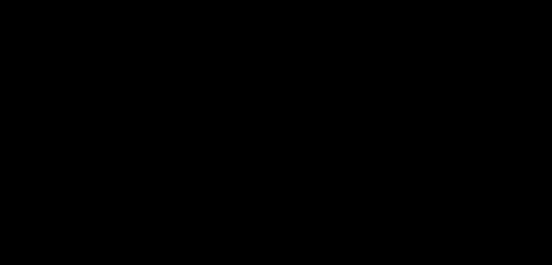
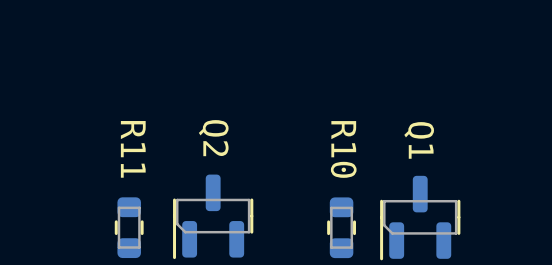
Q2: none -> (213, 216)
Q1: none -> (420, 218)
R11: none -> (129, 227)
R10: none -> (341, 227)

